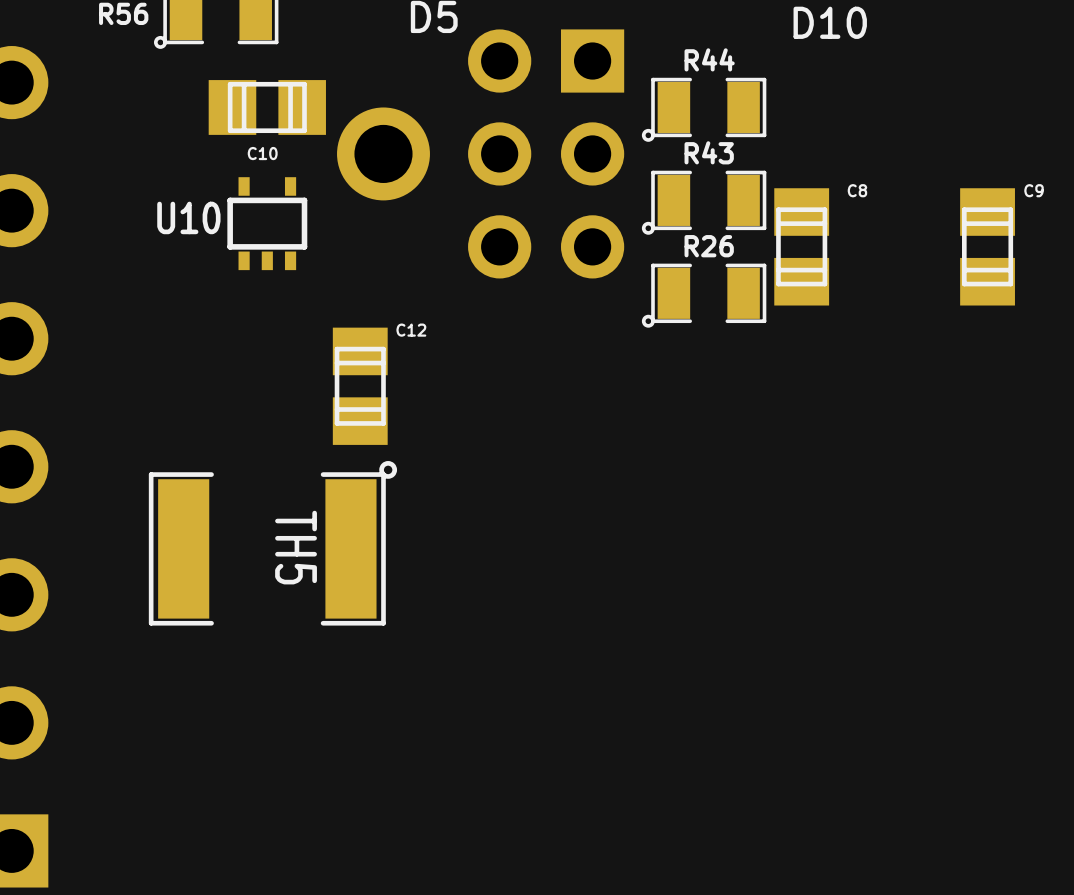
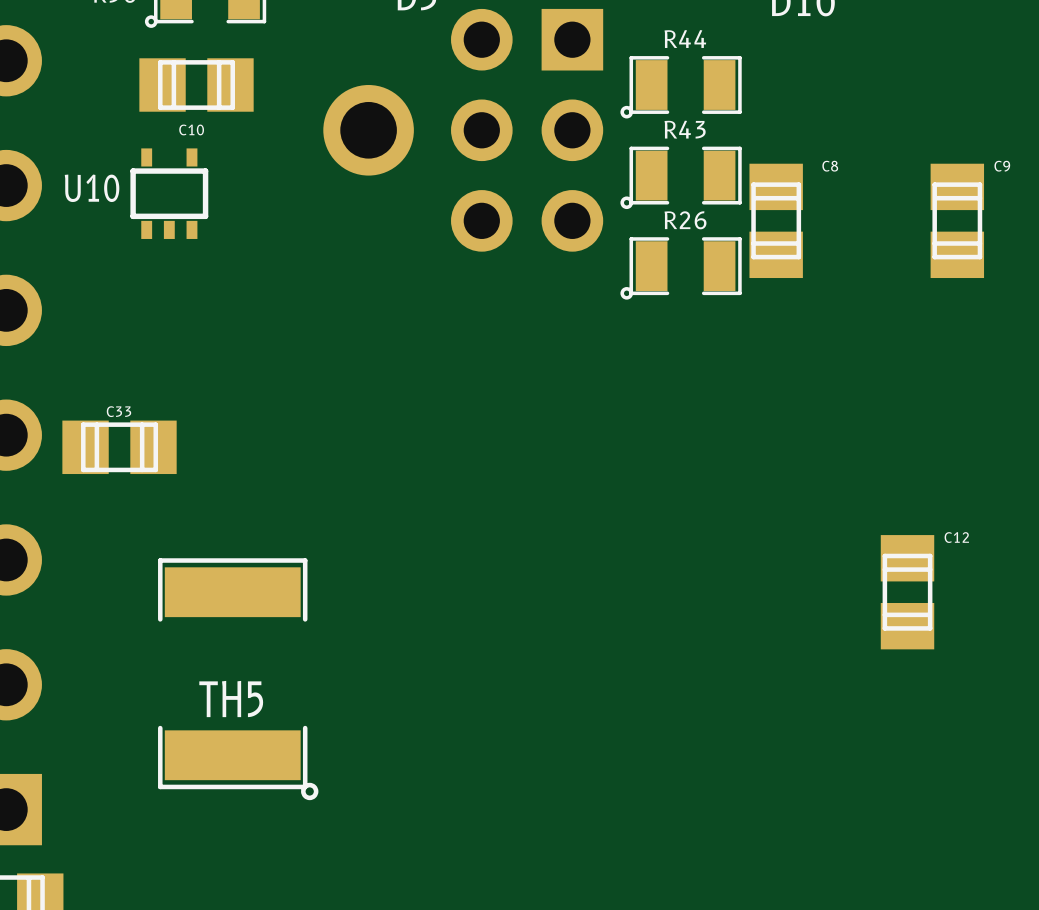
C10 position: (267, 107) -> (196, 85)
U10 position: (267, 223) -> (169, 193)
C12 position: (360, 386) -> (907, 592)
C33: none -> (119, 447)
TH5 rotation: 0° (272, 543) -> 90° clockwise (238, 679)
TH5 position: (272, 543) -> (238, 679)

